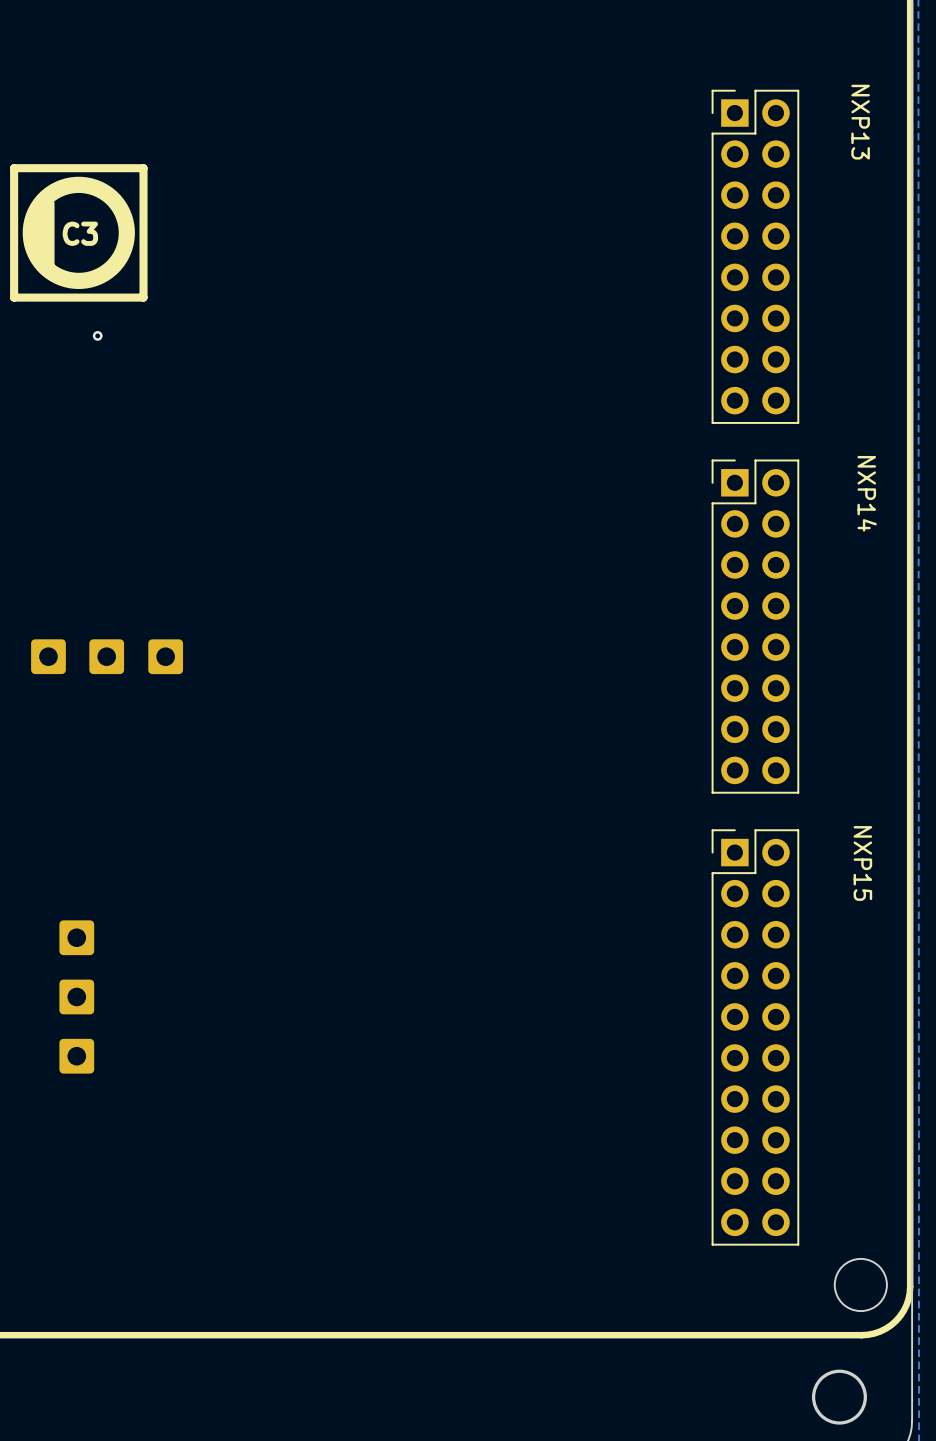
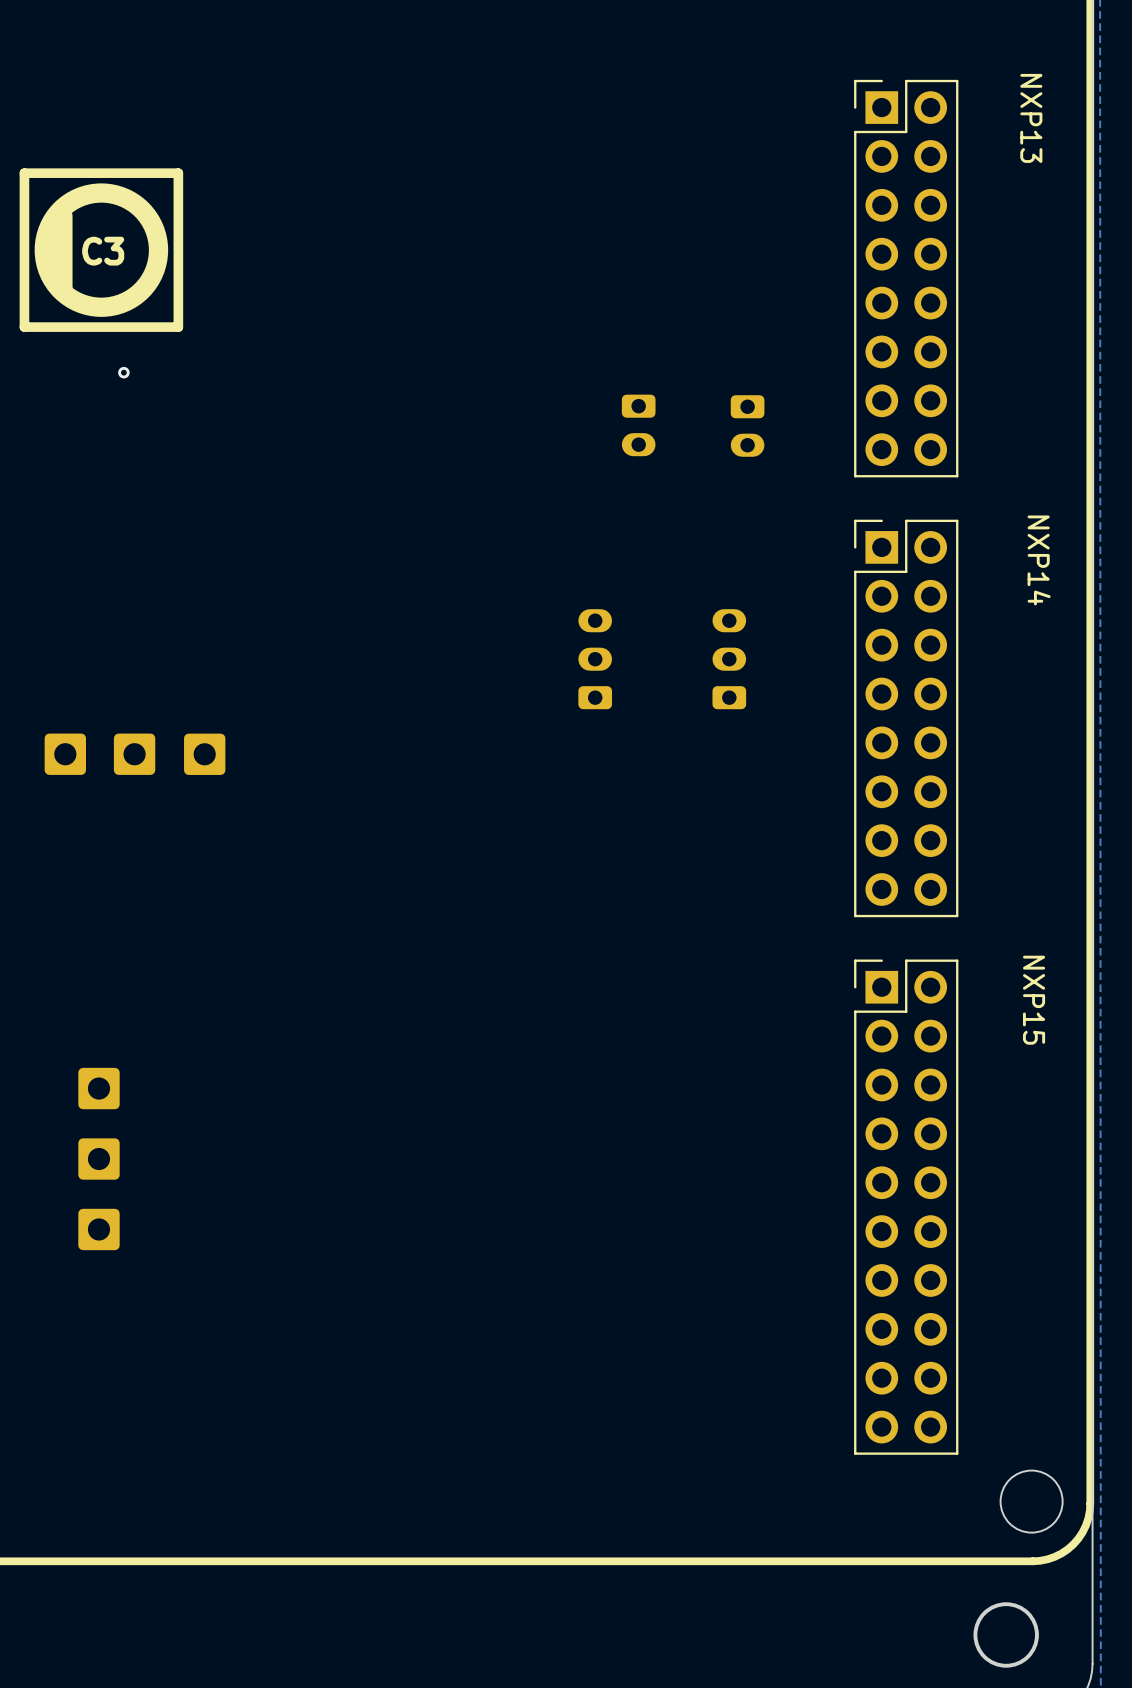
part: none -> (638, 425)
part: none -> (747, 425)
part: none -> (595, 659)
part: none -> (729, 659)

